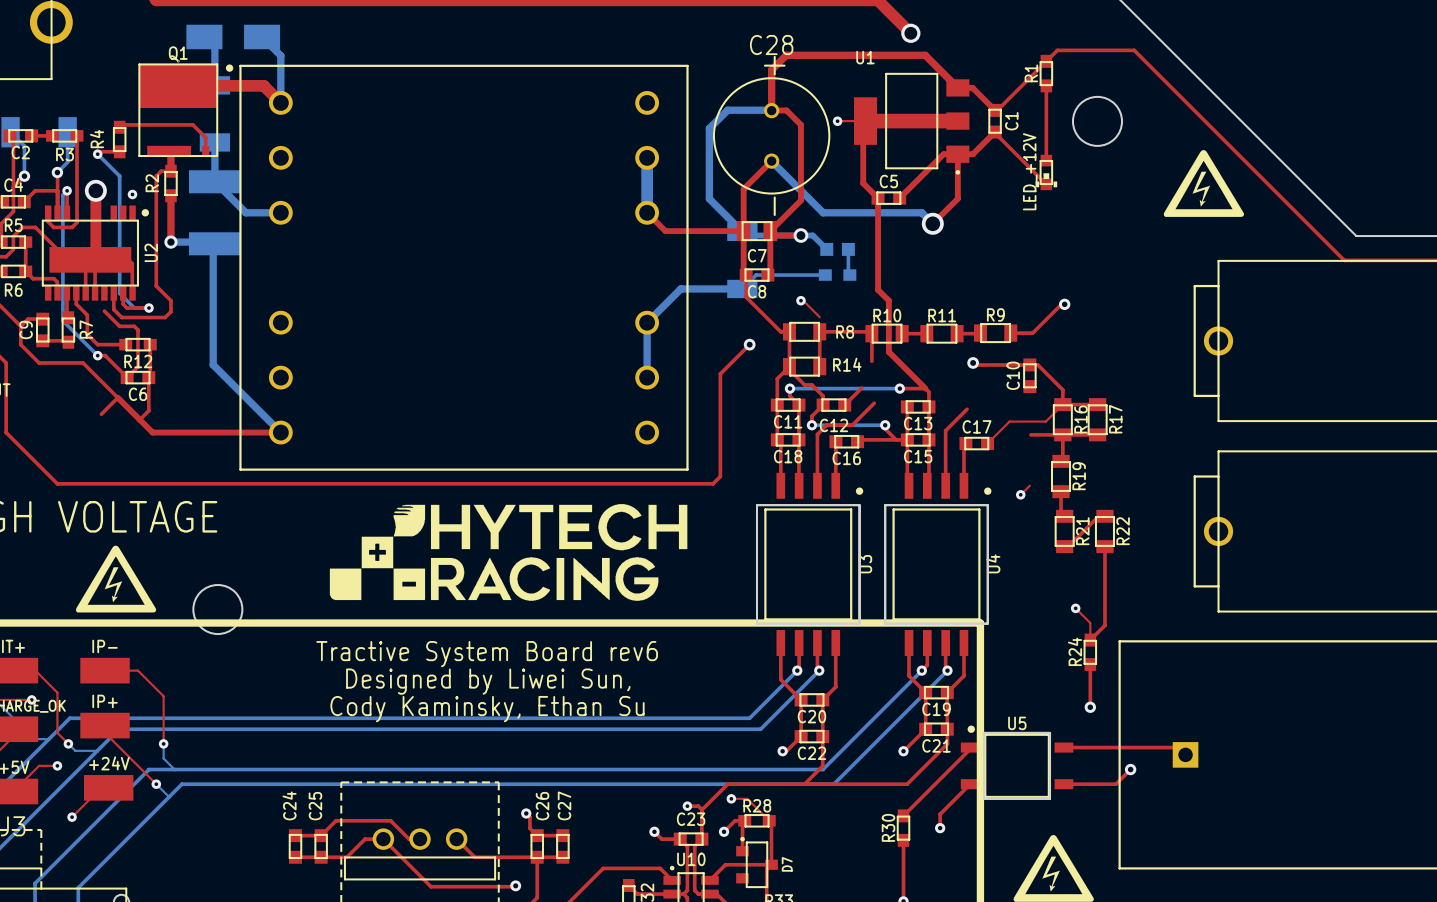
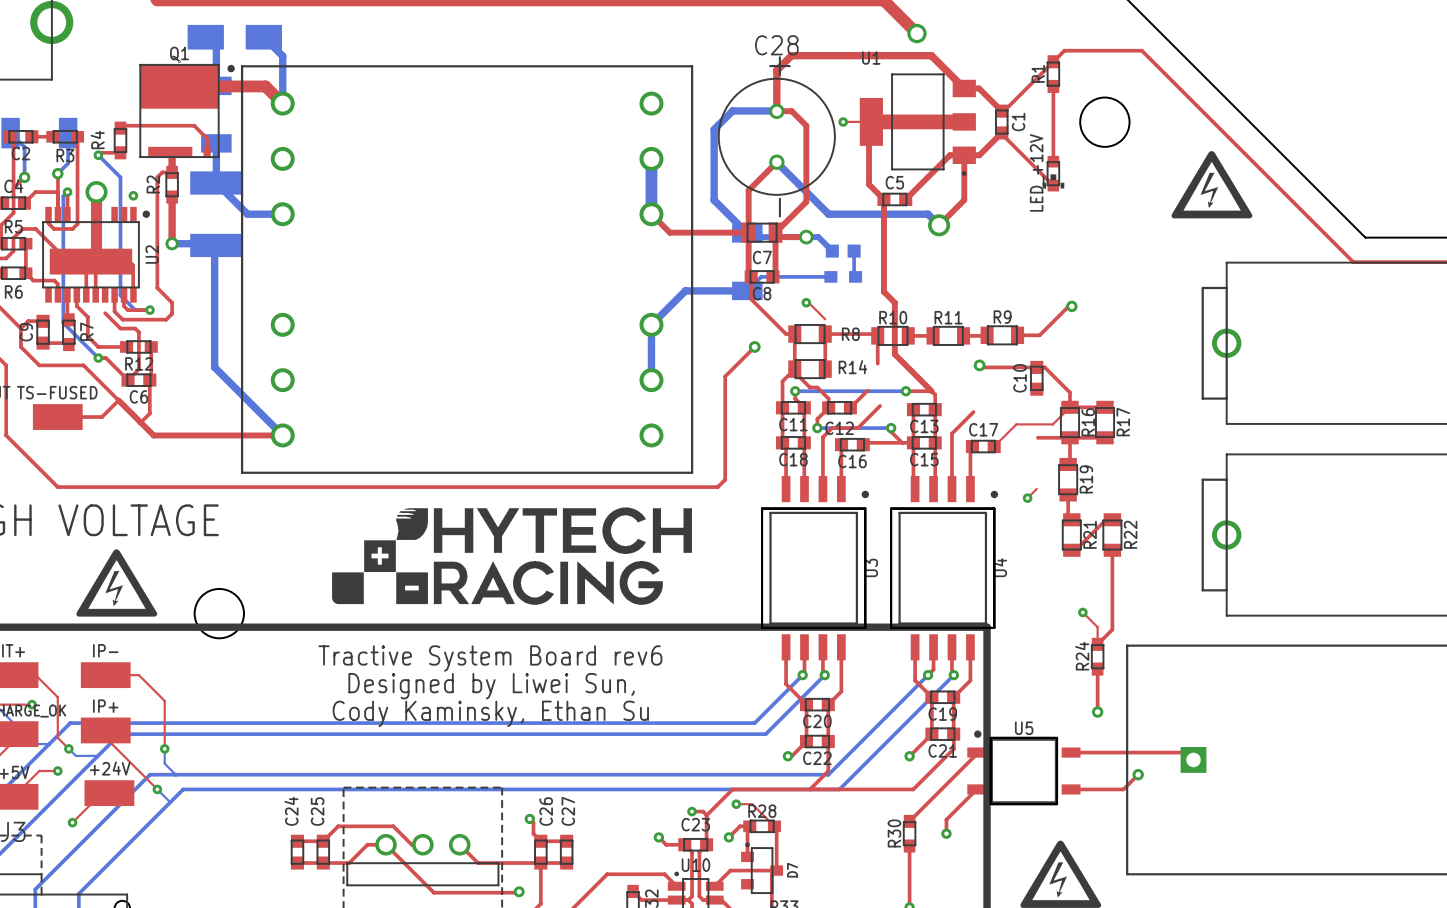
top track: none -> (57, 417) (102, 417)
TS-FUSED: none -> (57, 417)

